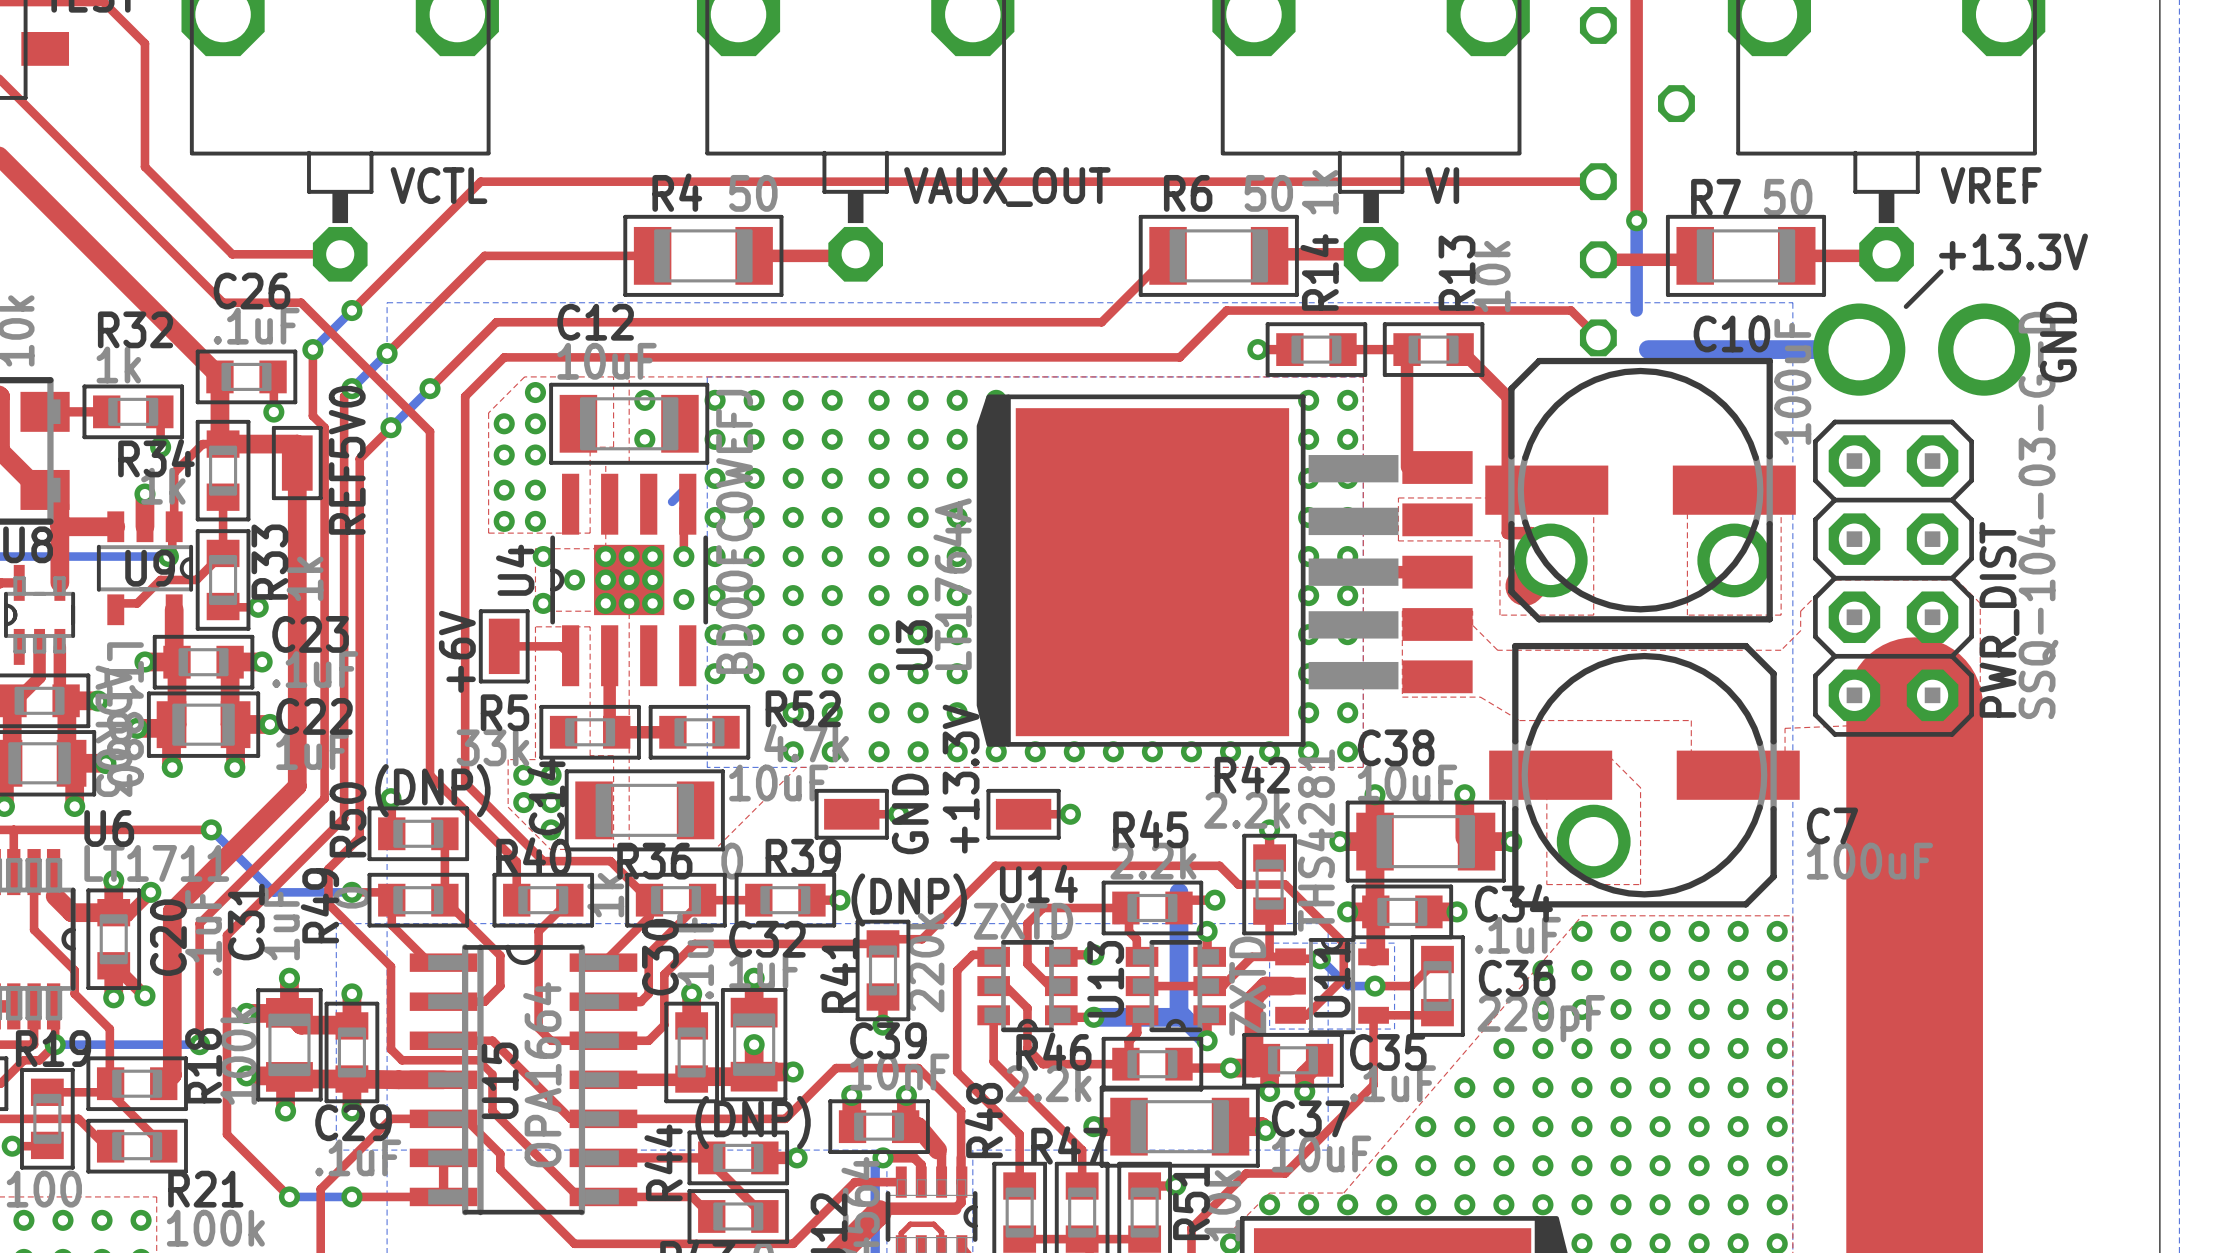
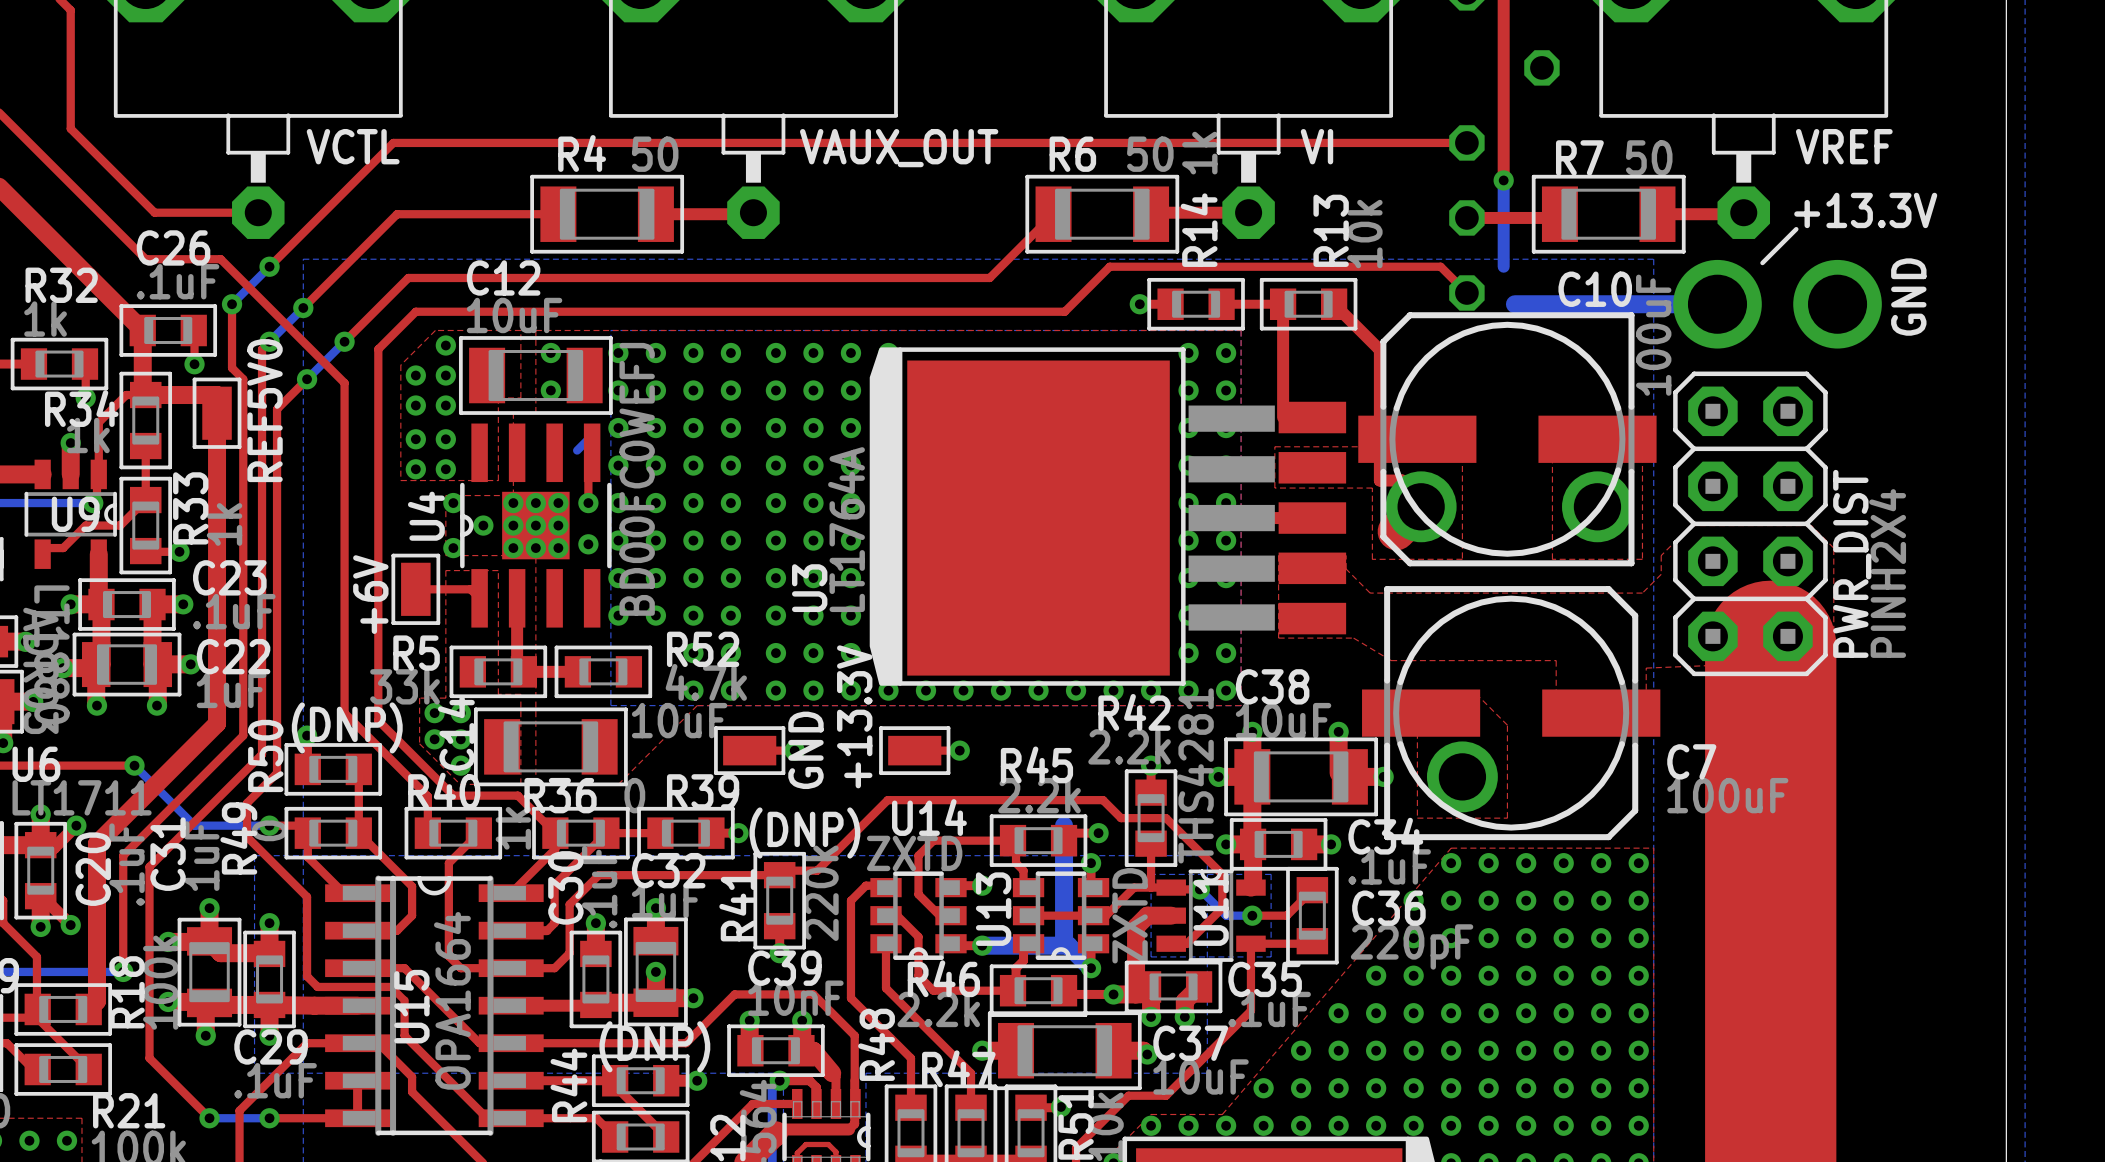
PWR_DIST value: SSQ-104-03-G-D (2037, 515) -> PINH2X4 (1887, 573)

